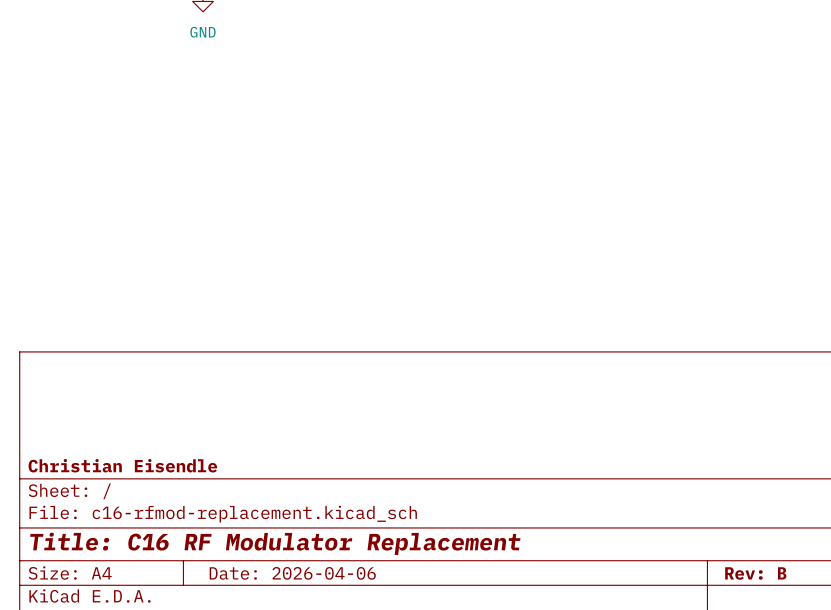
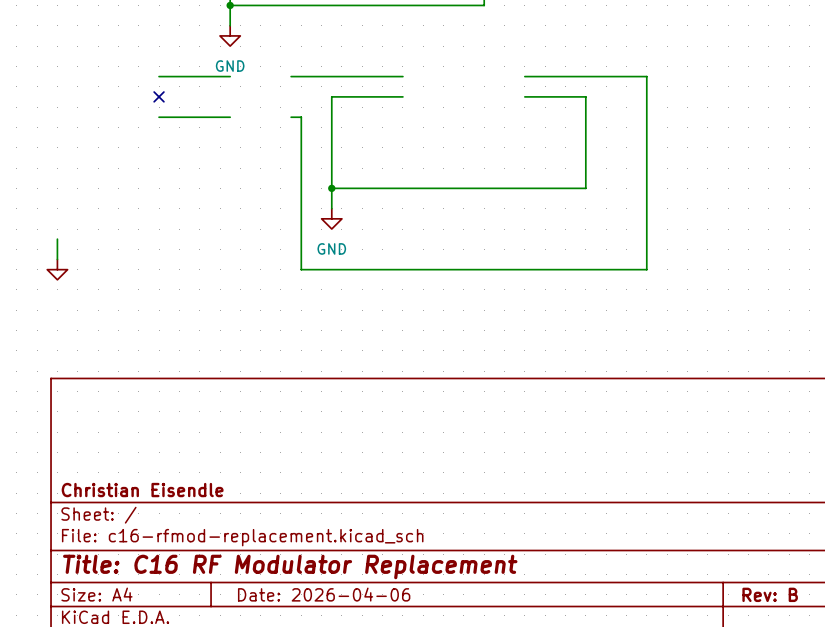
wire: none -> (159, 76) (230, 76)
wire: none -> (291, 76) (402, 76)
wire: none -> (524, 76) (646, 76) (646, 269) (301, 269) (301, 117) (291, 117)
no-connect mark: none -> (159, 96)
wire: none -> (402, 96) (331, 96) (331, 208)
wire: none -> (524, 96) (585, 96) (585, 188) (331, 188)
wire: none -> (159, 117) (230, 117)
junction: none -> (331, 188)
power symbol: none -> GND (331, 218)
wire: none -> (57, 239) (57, 259)
power symbol: none -> (57, 269)

